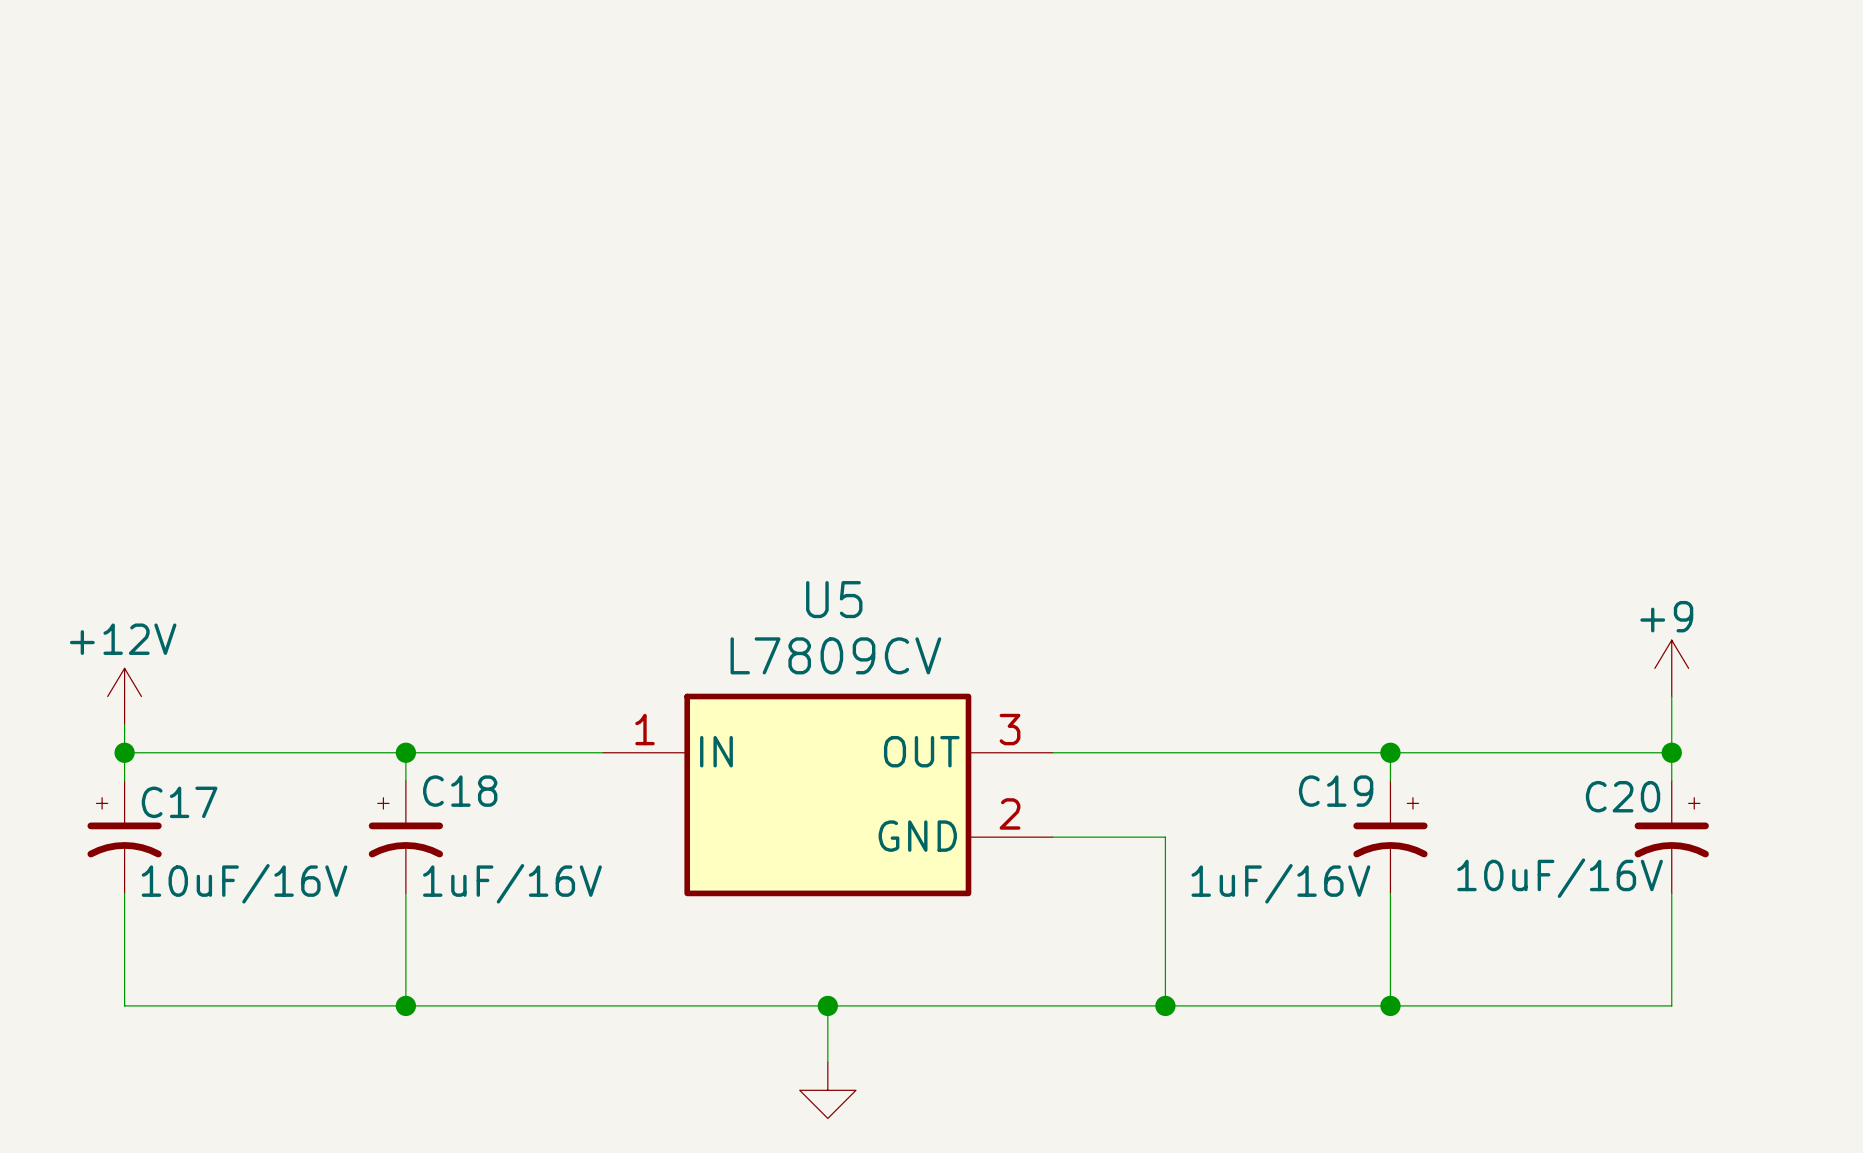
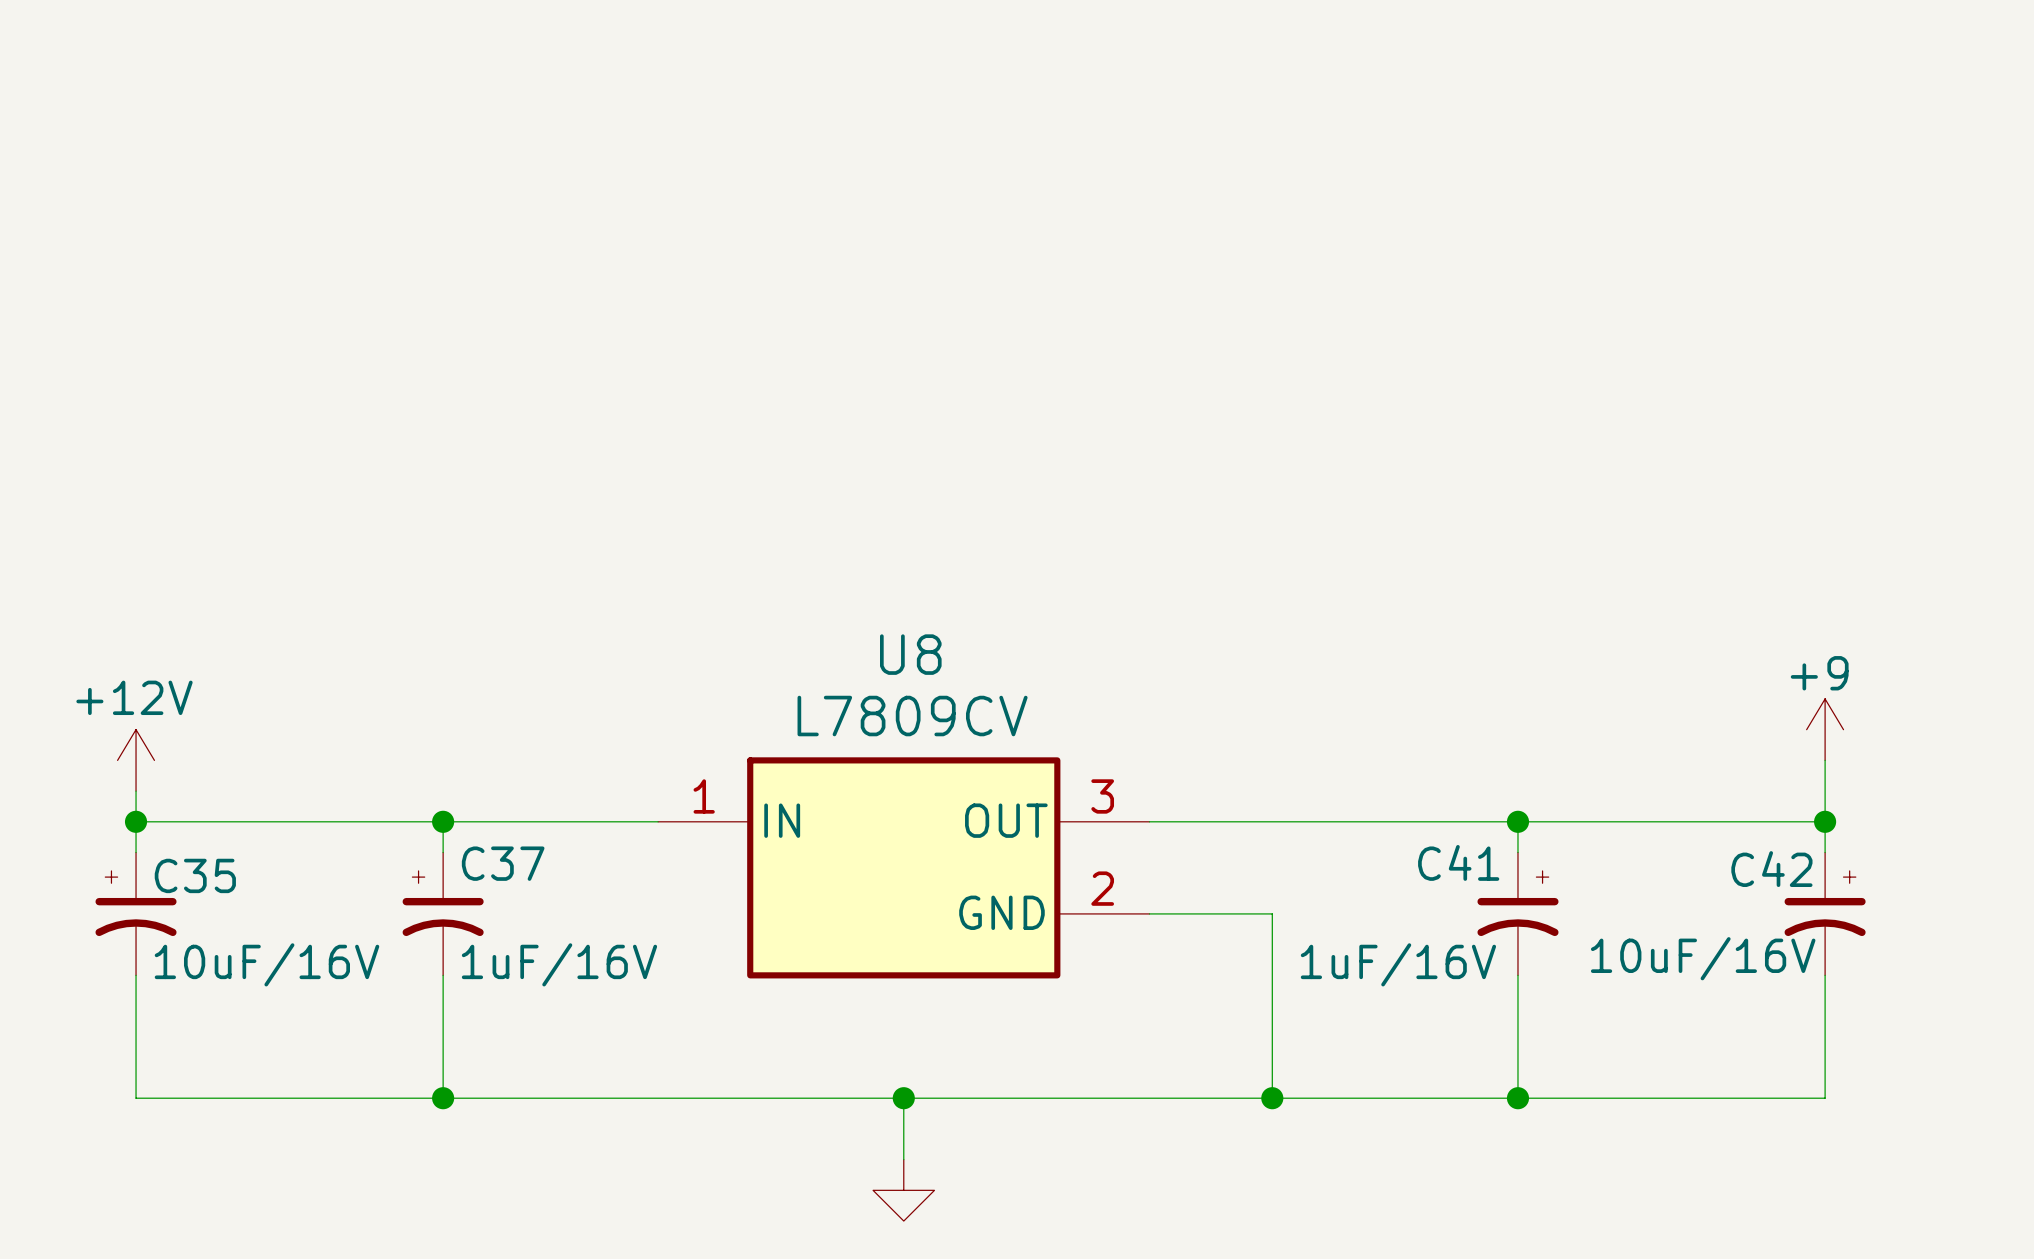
U5 name: U5 (834, 599) -> U8 (910, 654)
C18 name: C18 (460, 791) -> C37 (503, 863)
C19 name: C19 (1336, 791) -> C41 (1458, 862)
C20 name: C20 (1623, 796) -> C42 (1771, 869)
C17 name: C17 (179, 802) -> C35 (195, 875)

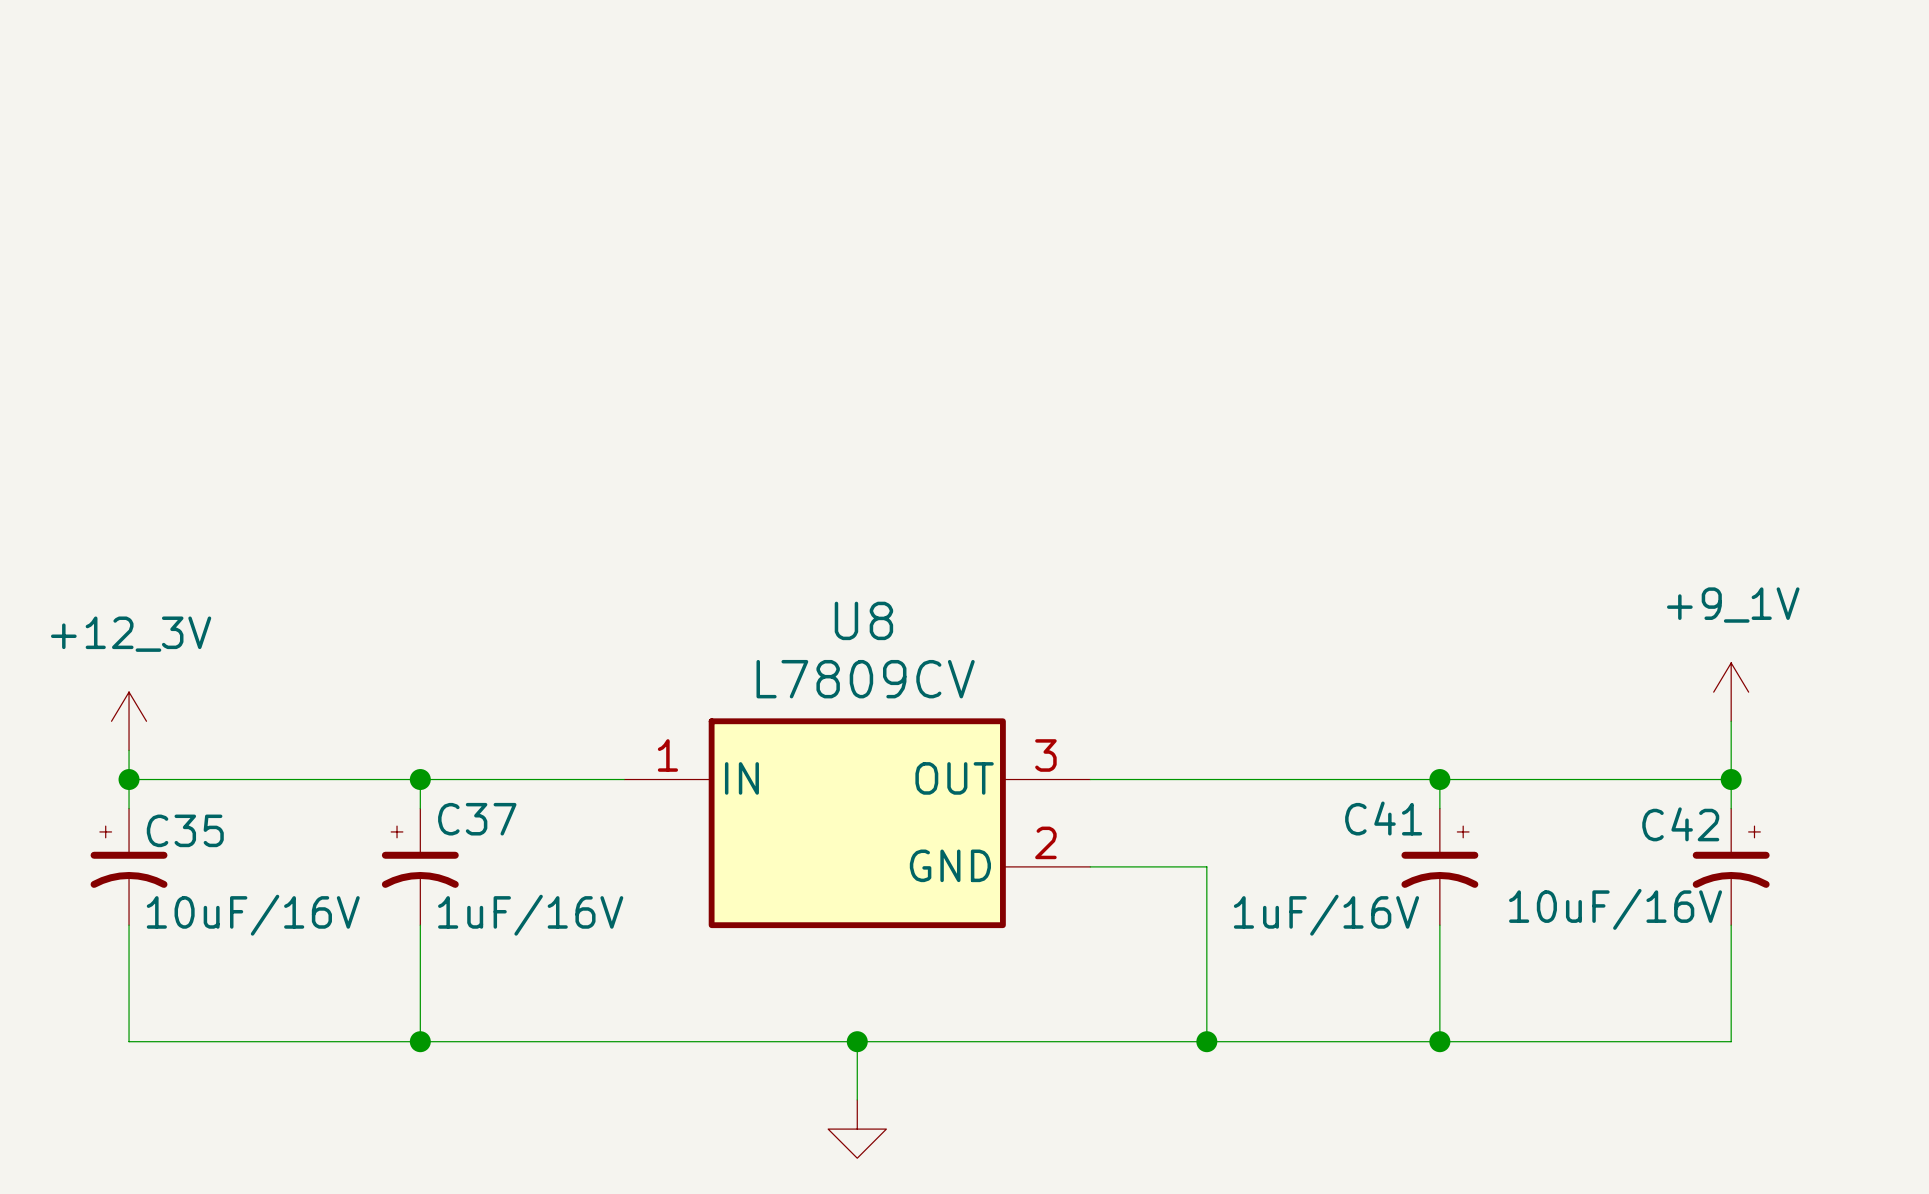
power symbol: +9 (1825, 729) -> +9_1V (1731, 692)
power symbol: +12V (136, 760) -> +12_3V (129, 721)

